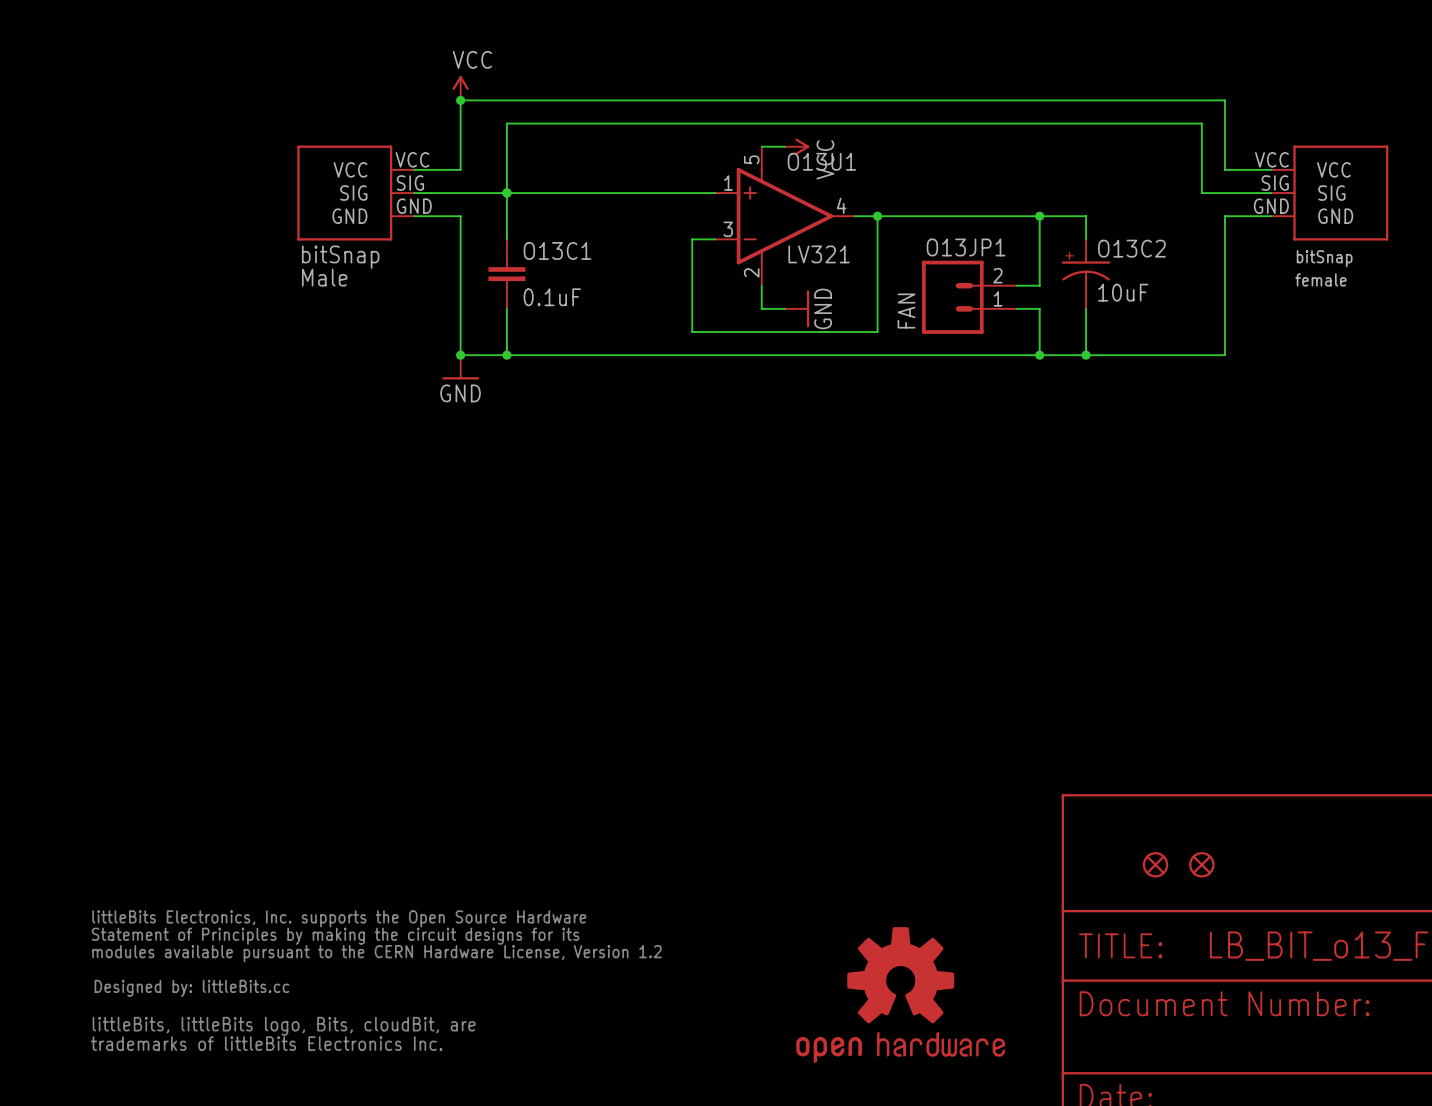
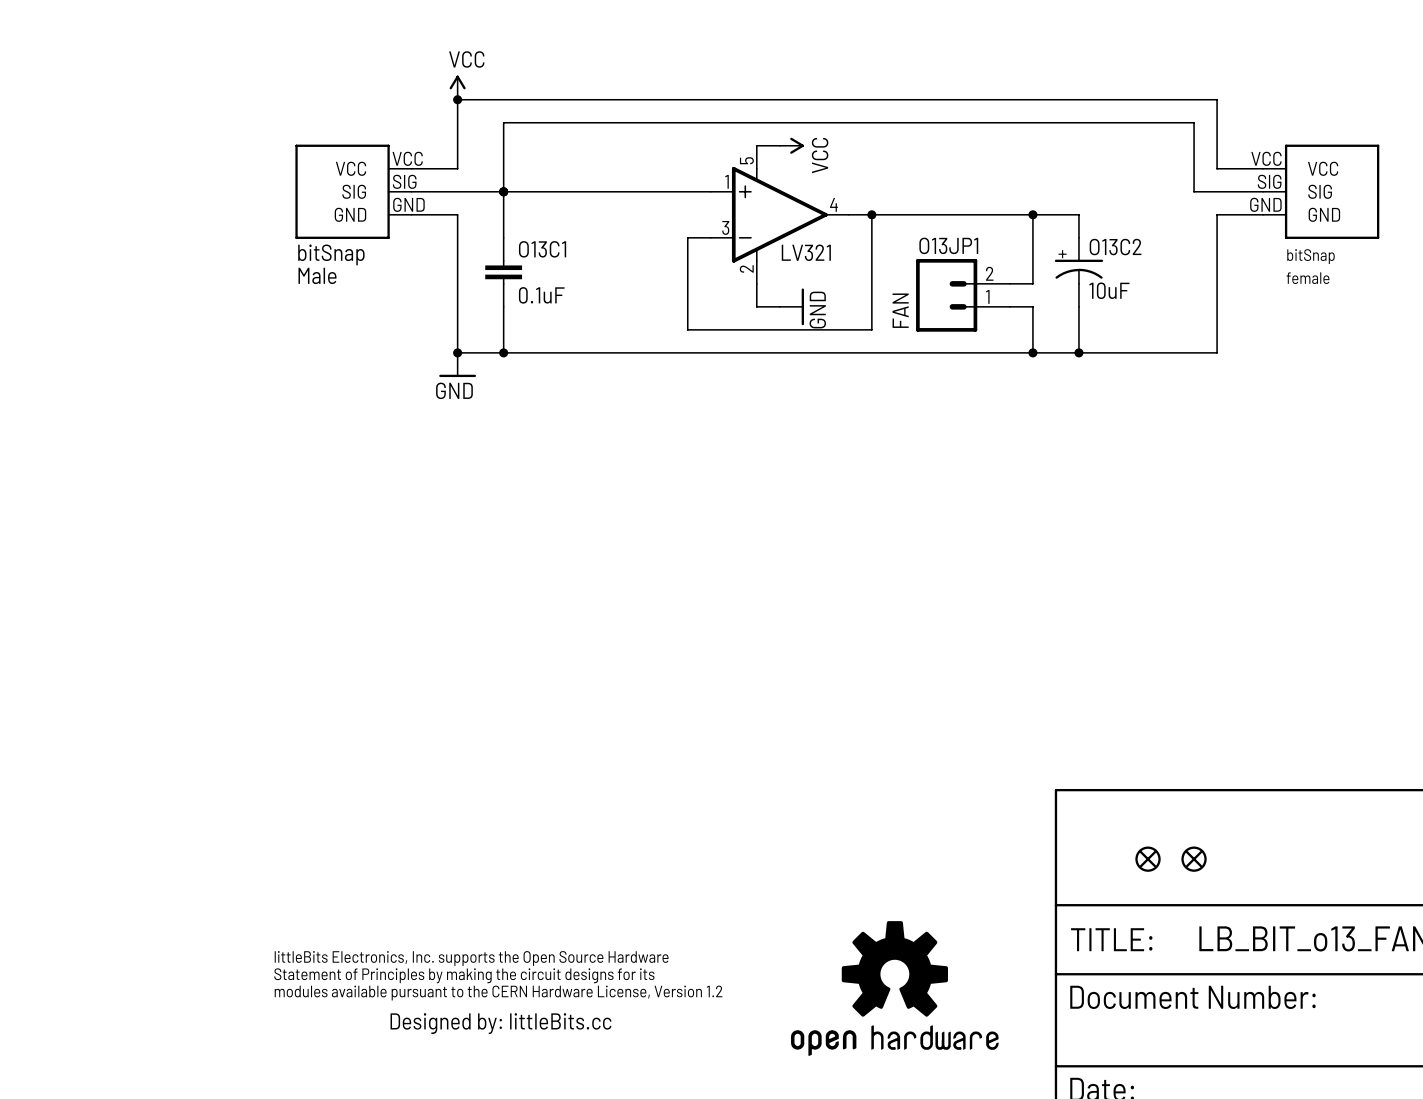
O13U1 name: O13U1 (821, 161) -> none
part: (376, 980) -> none
part: none -> (498, 992)

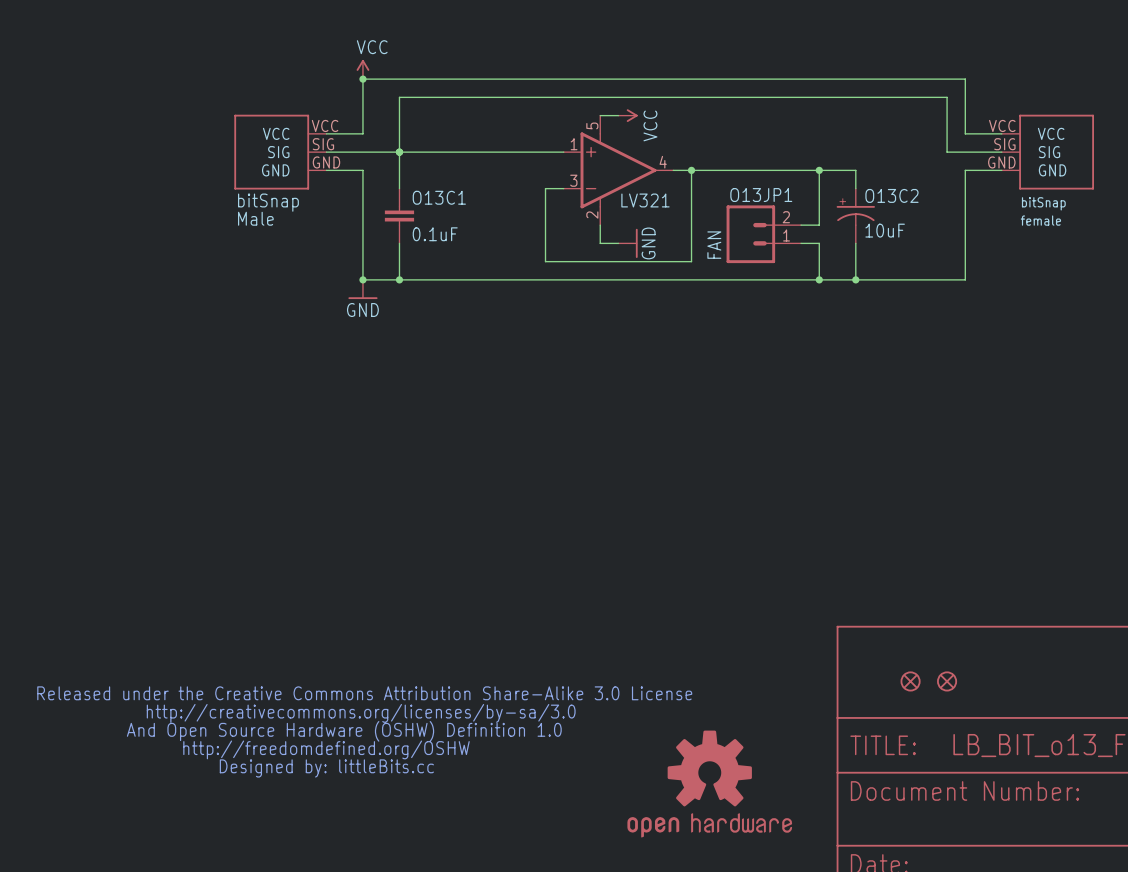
part: none -> (364, 731)
part: (498, 992) -> none

